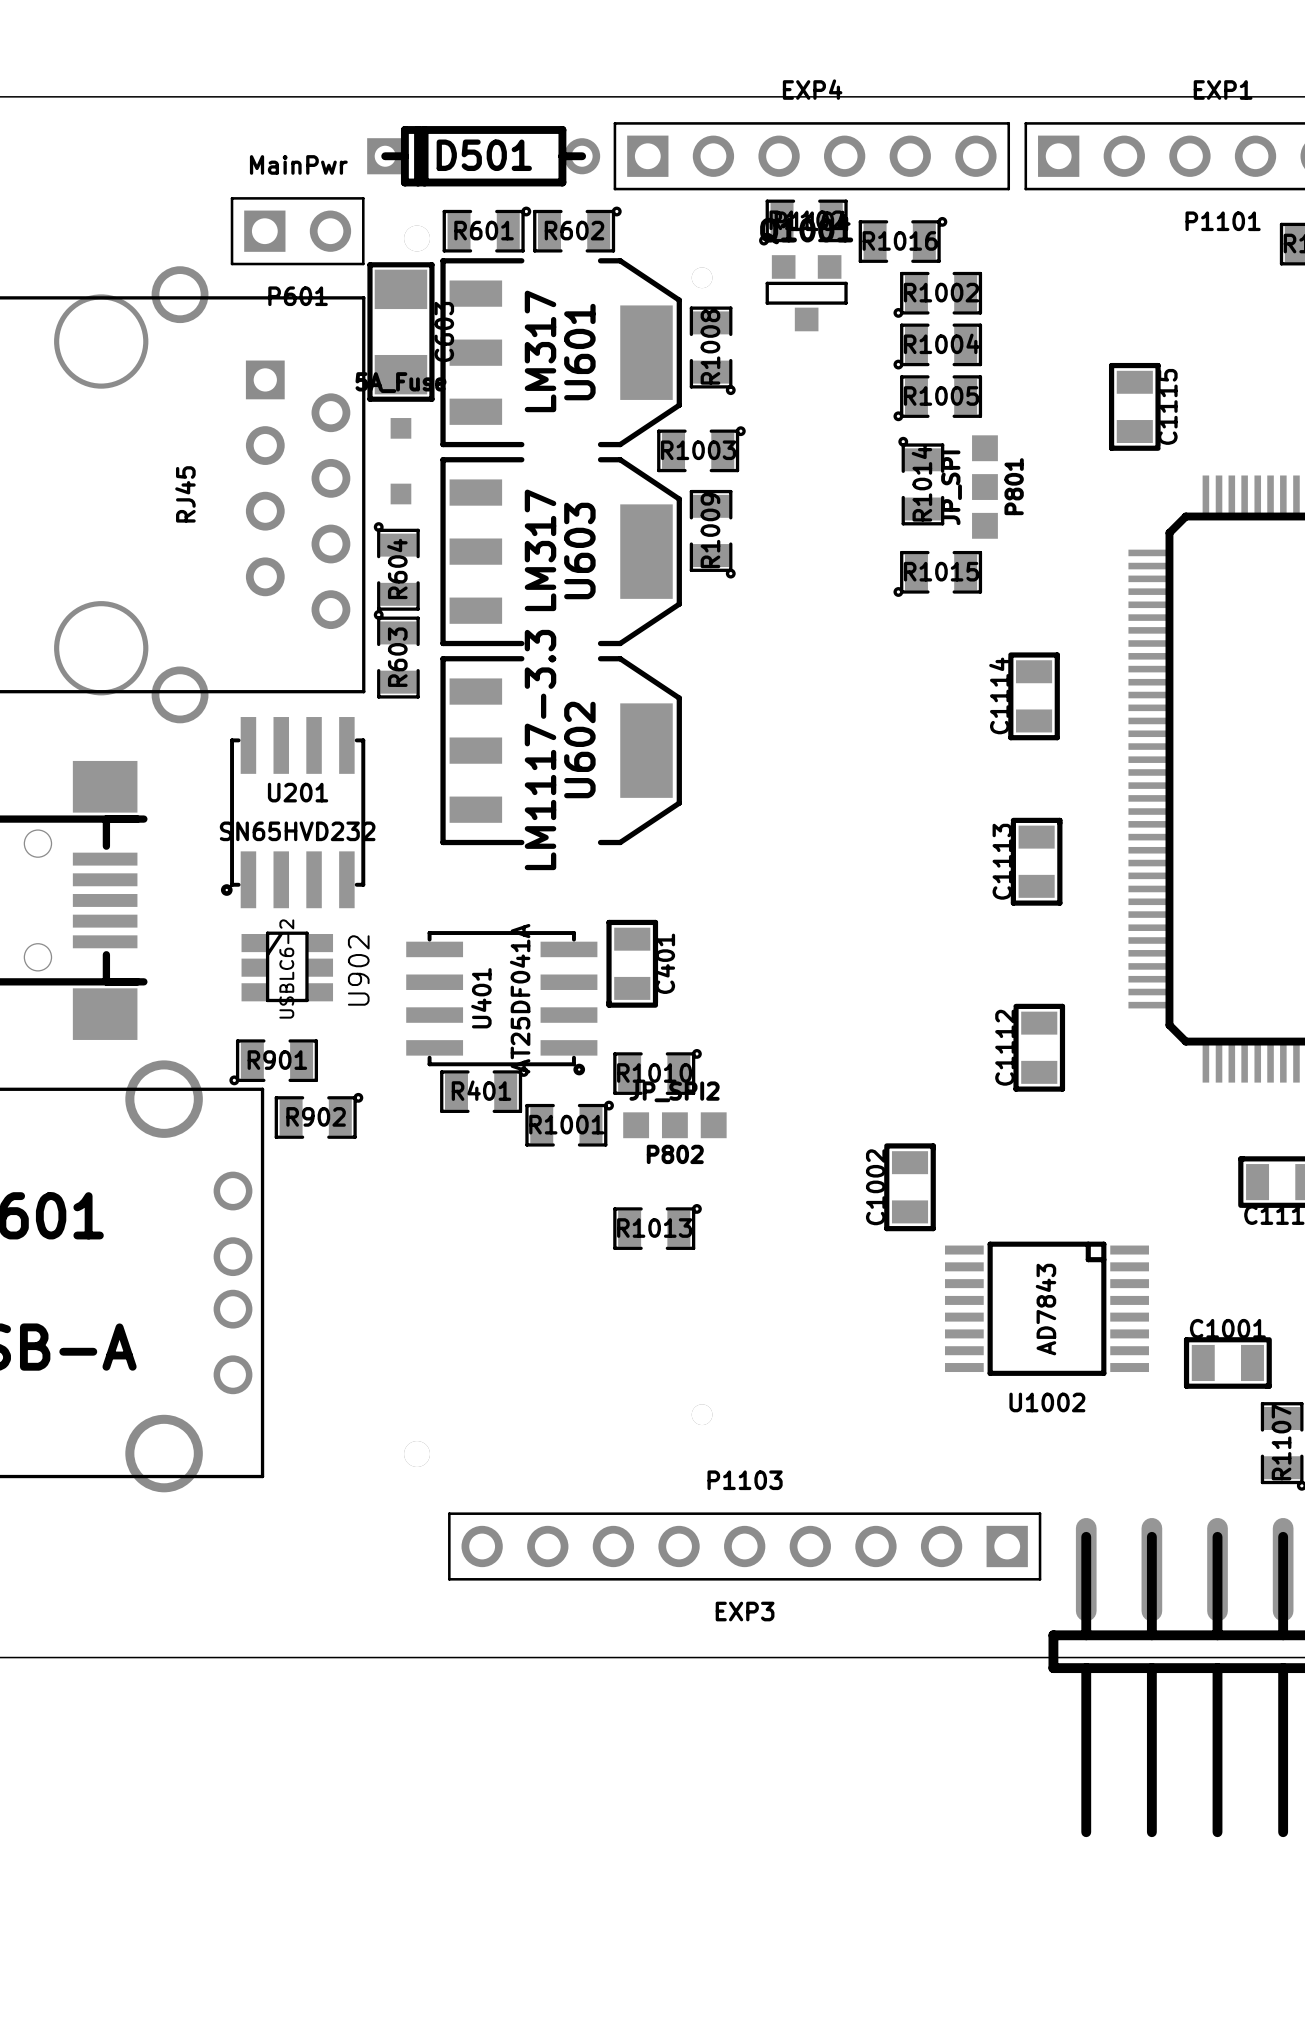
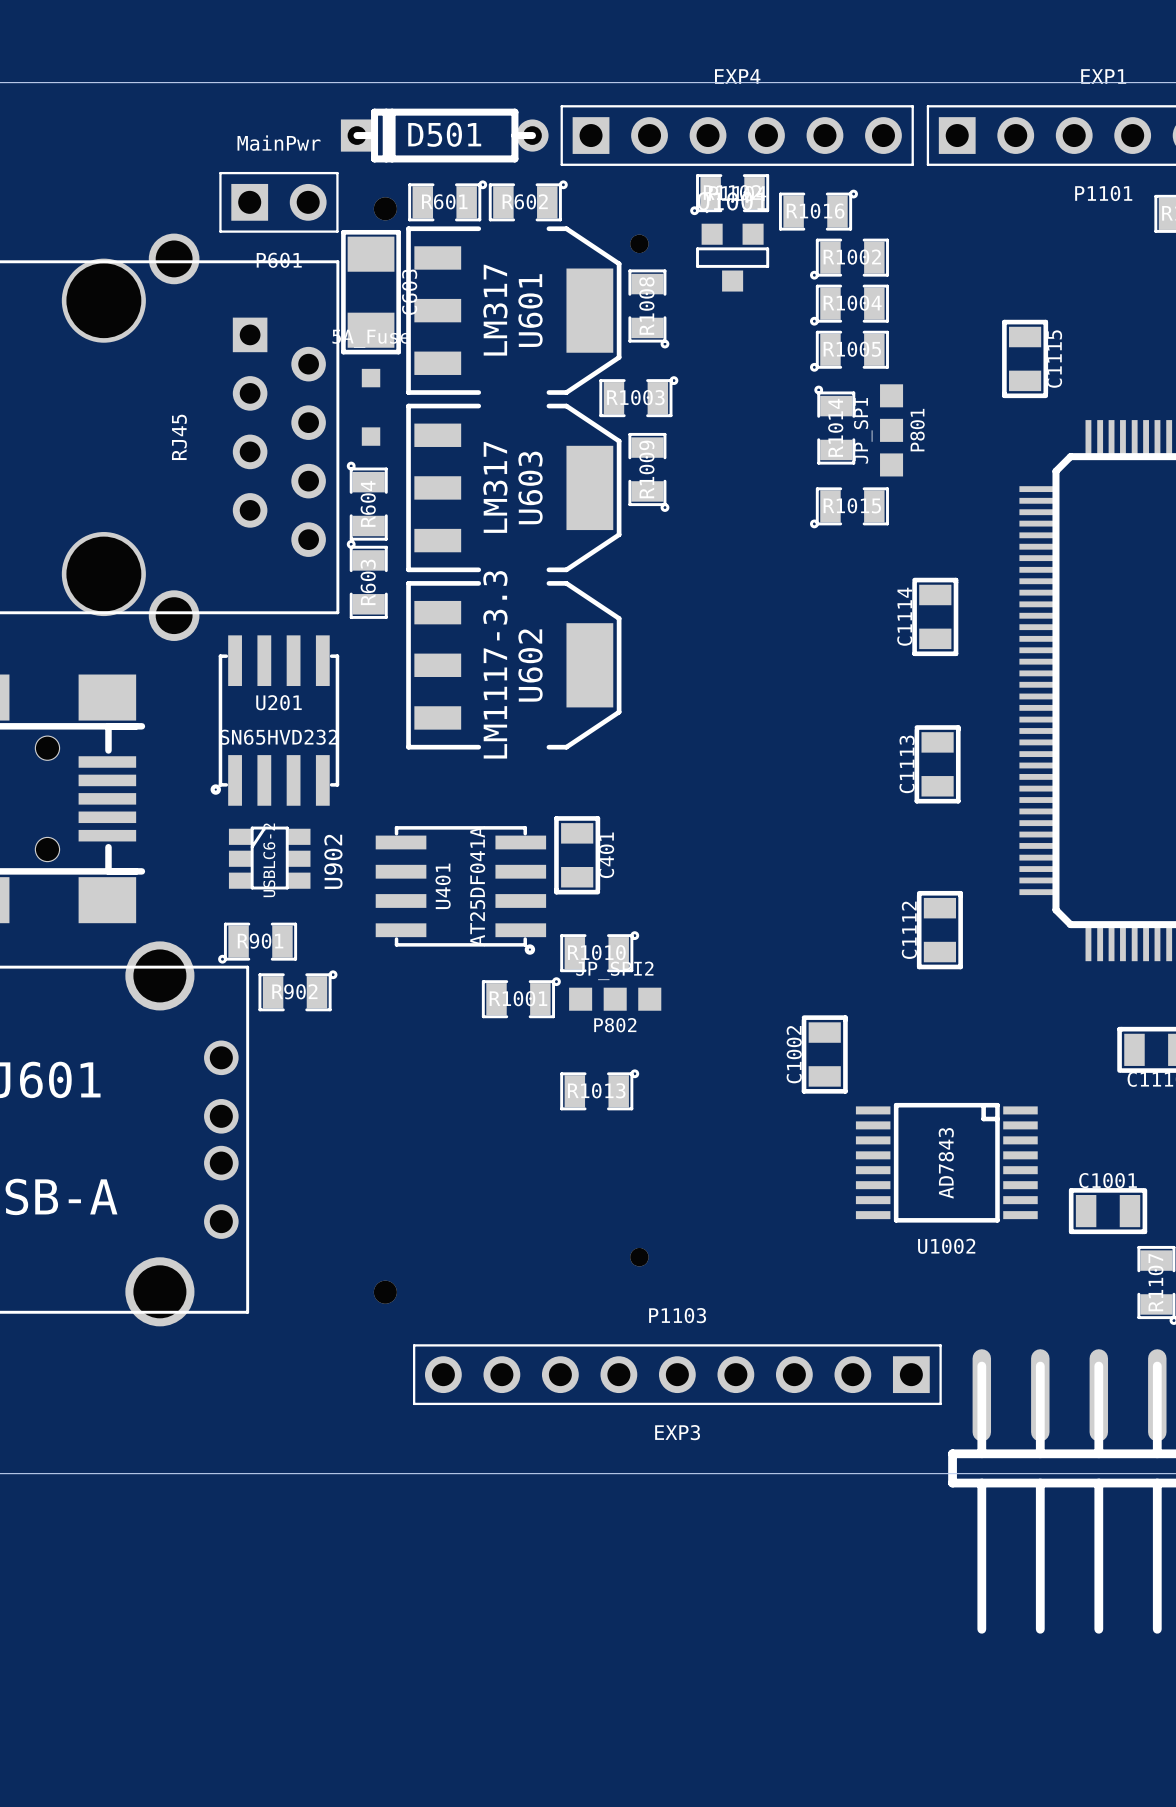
R401: (484, 1090) -> none

